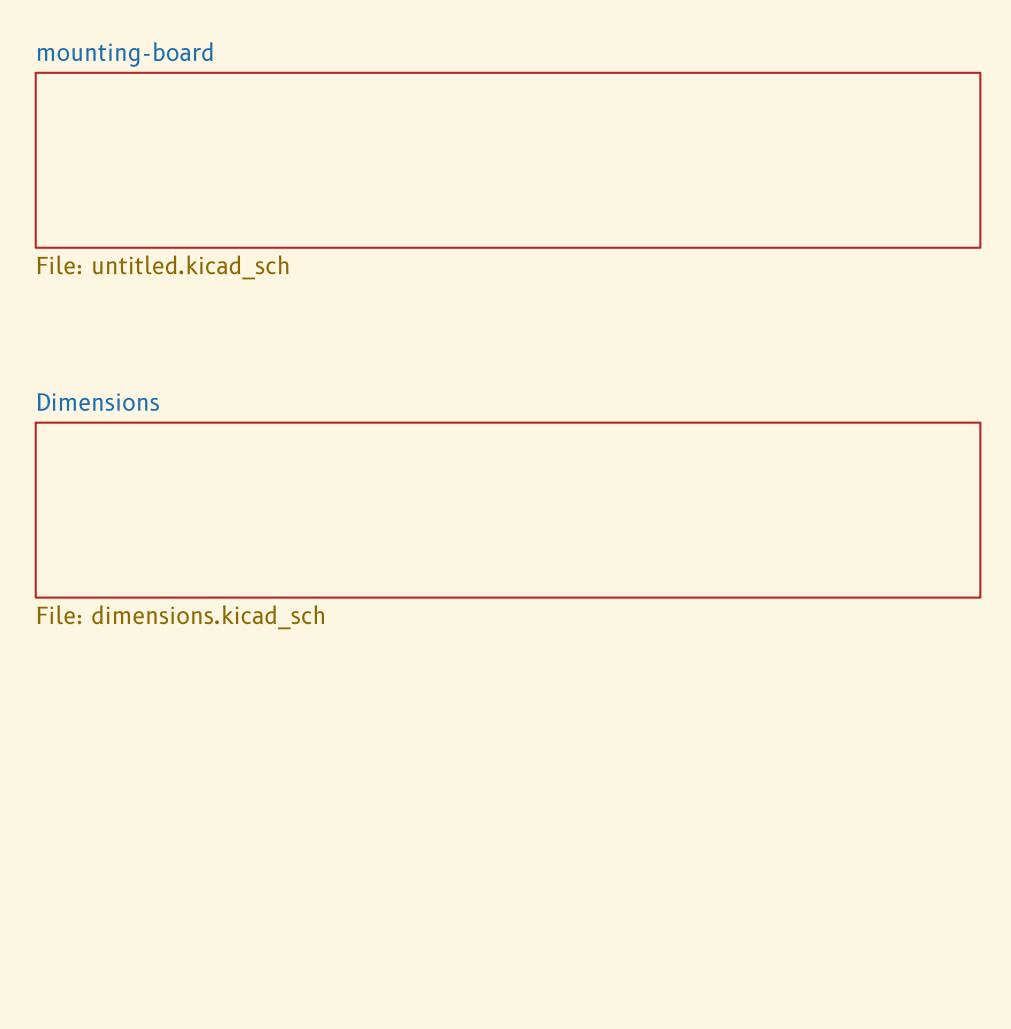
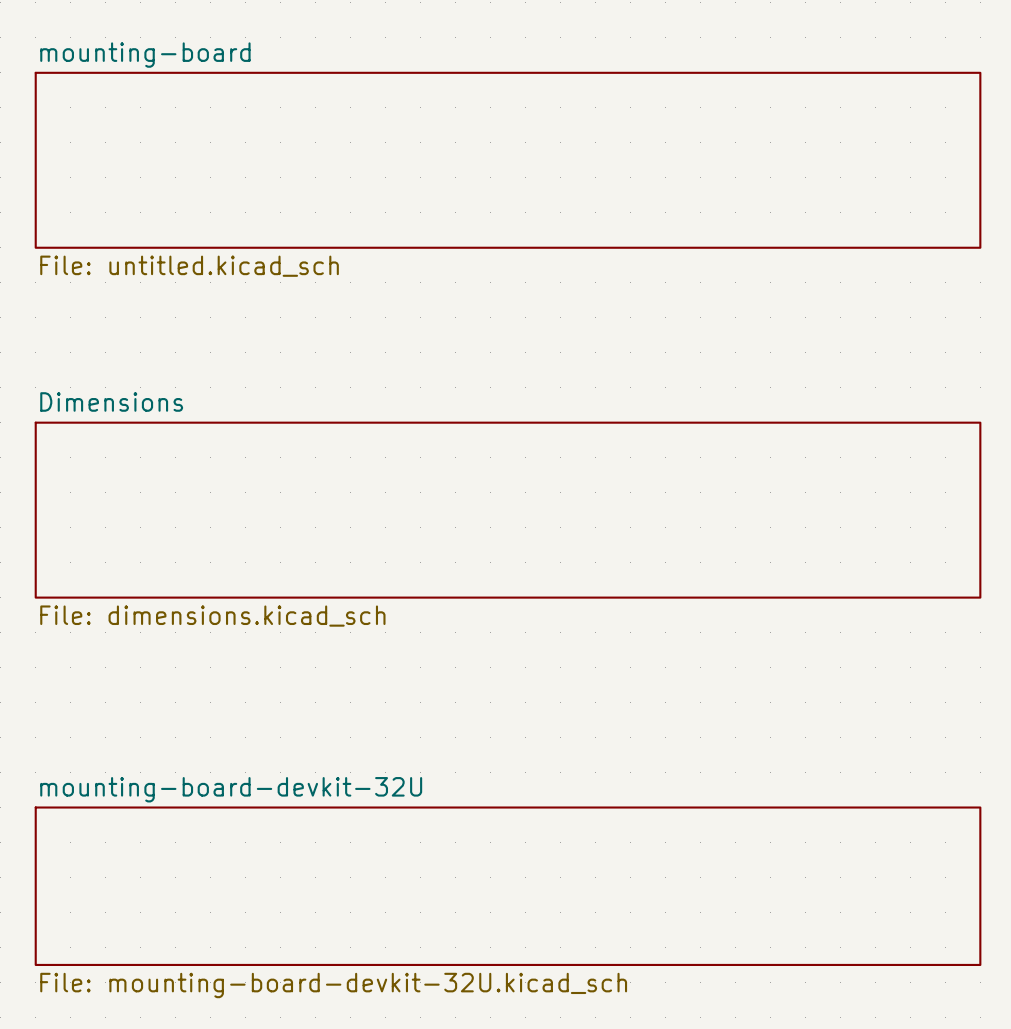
sheet mounting-board-devkit-32U: none -> File: mounting-board-devkit-32U.kicad_sch (508, 886)

